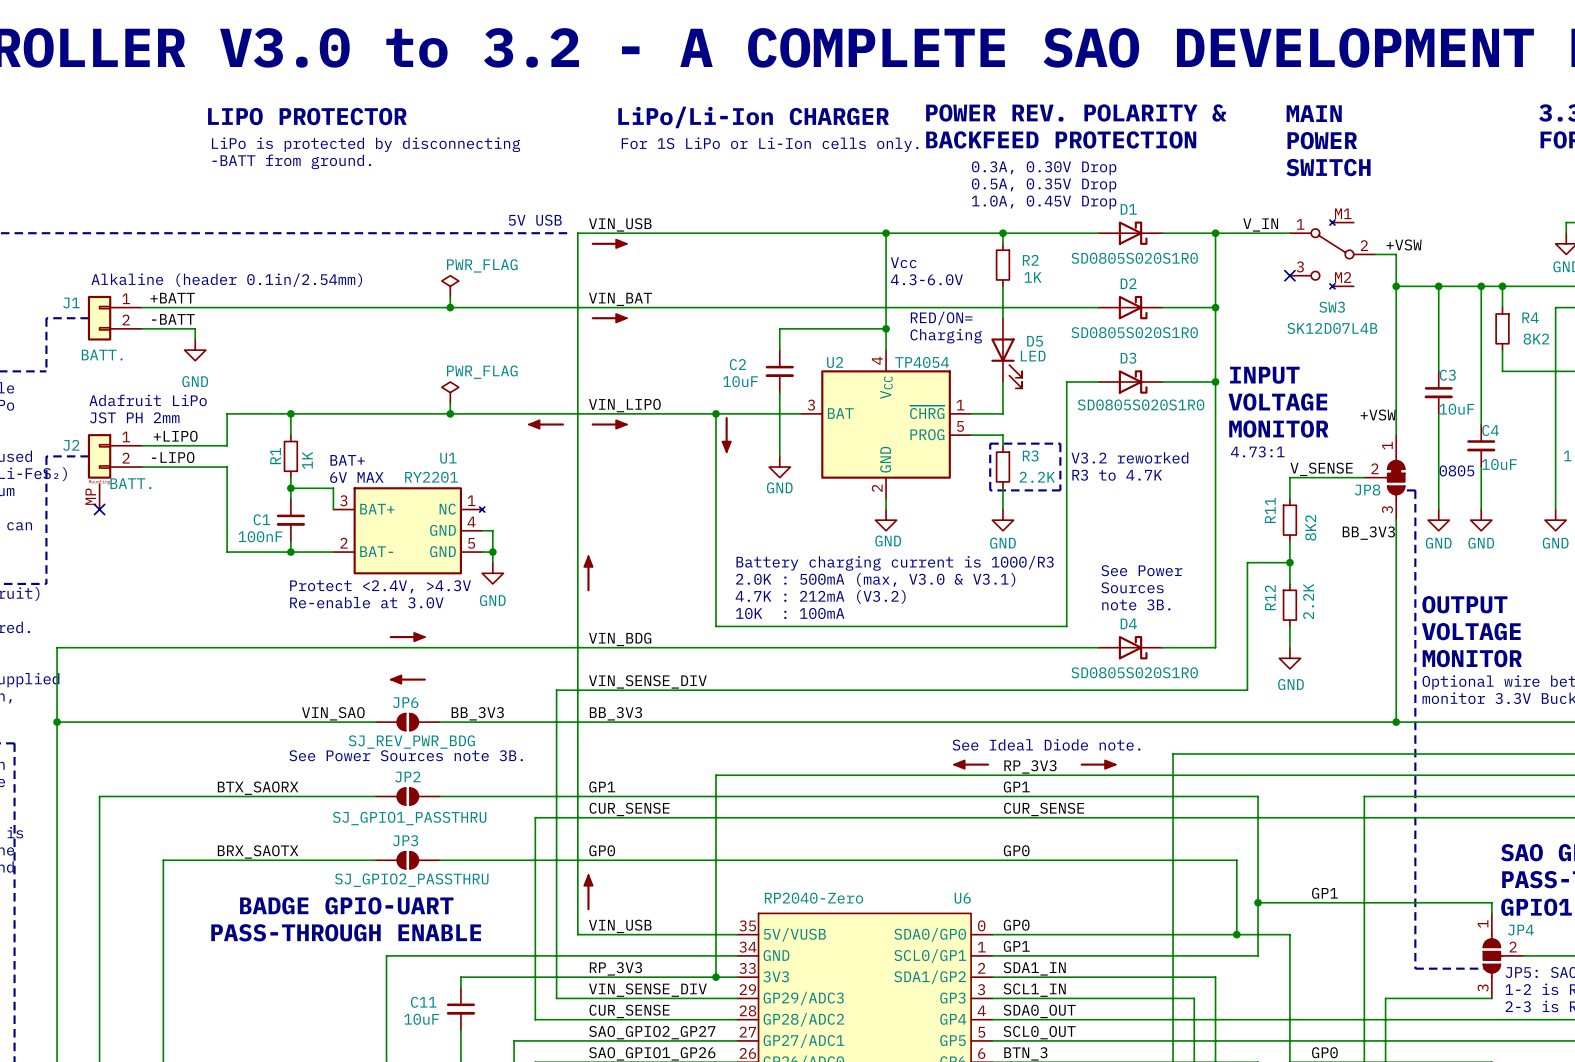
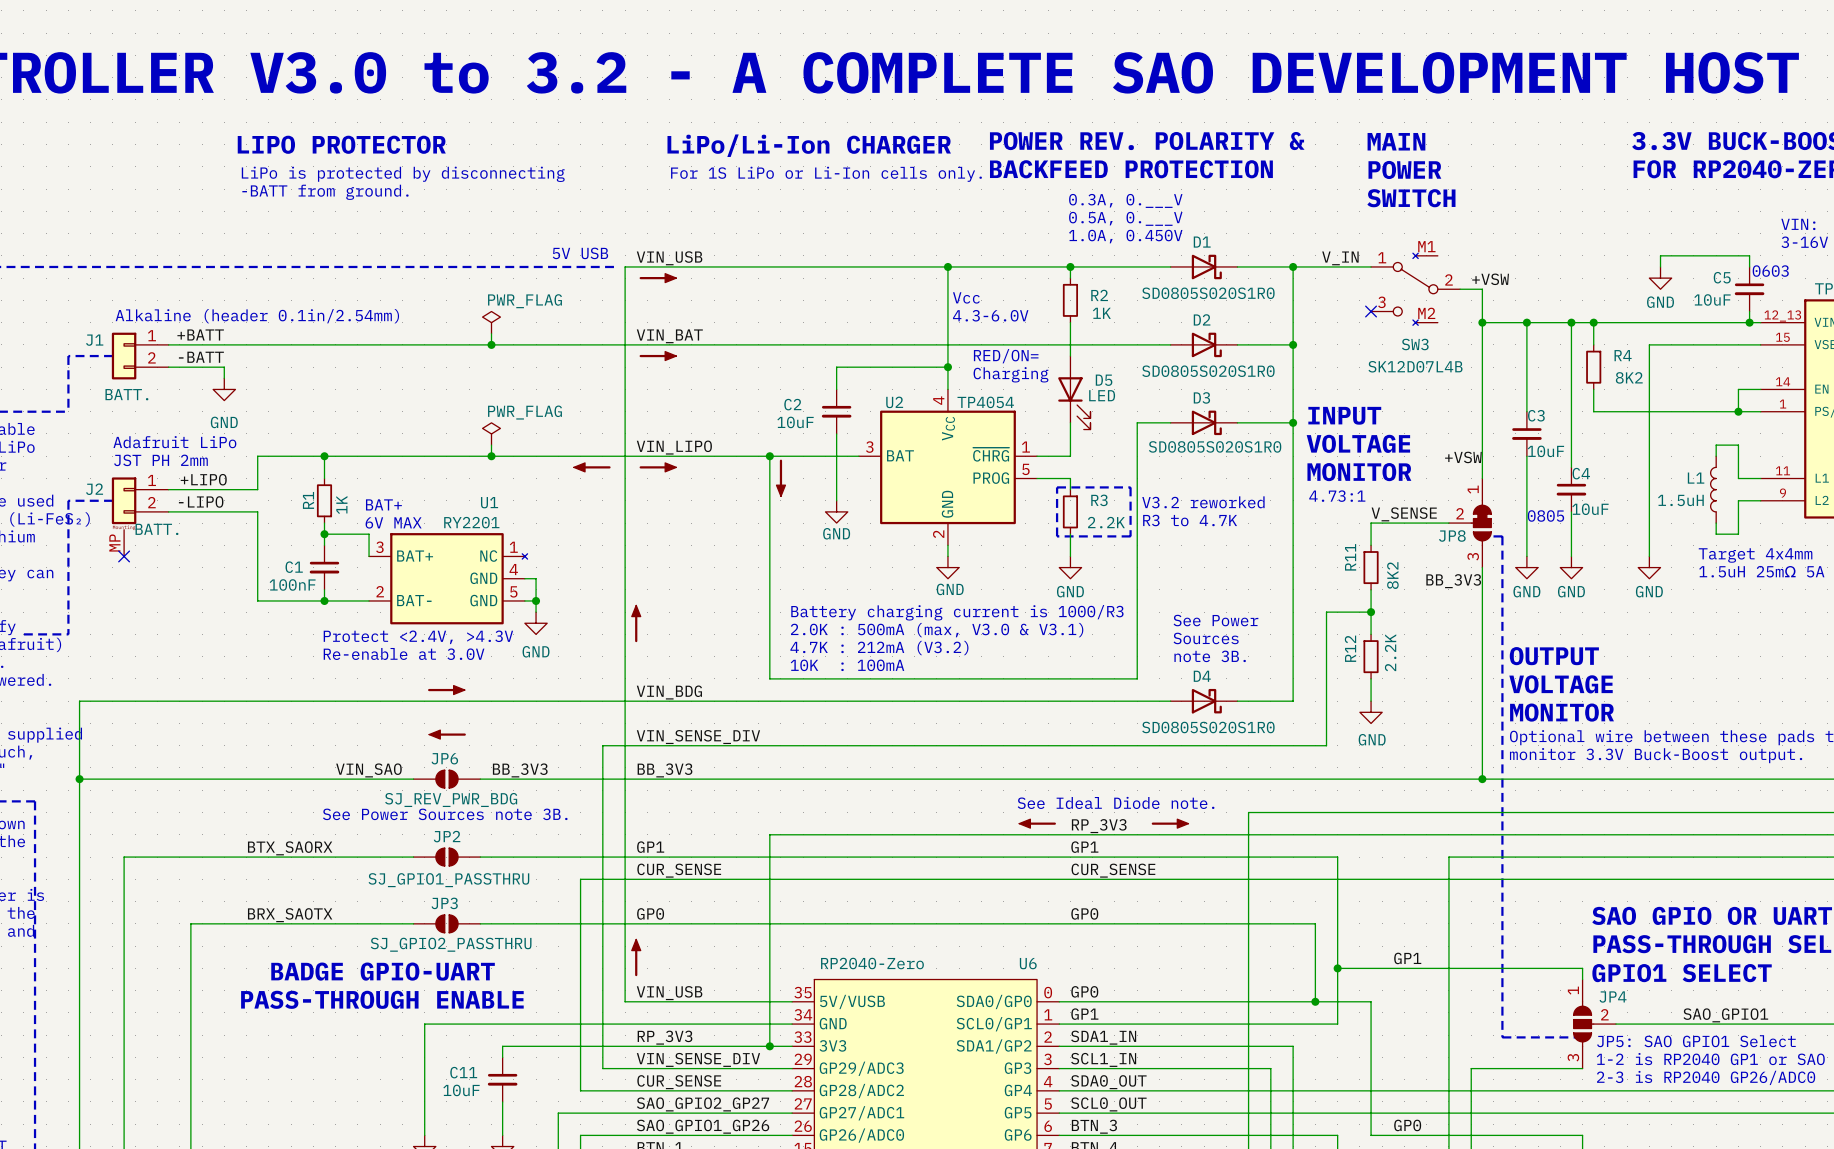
text: 0.3A, 0.30V Drop (1044, 168) -> 0.3A, 0.___V (1125, 200)
text: 0.5A, 0.35V Drop (1044, 185) -> 0.5A, 0.___V (1125, 218)
text: 1.0A, 0.45V Drop (1044, 202) -> 1.0A, 0.450V (1125, 236)

